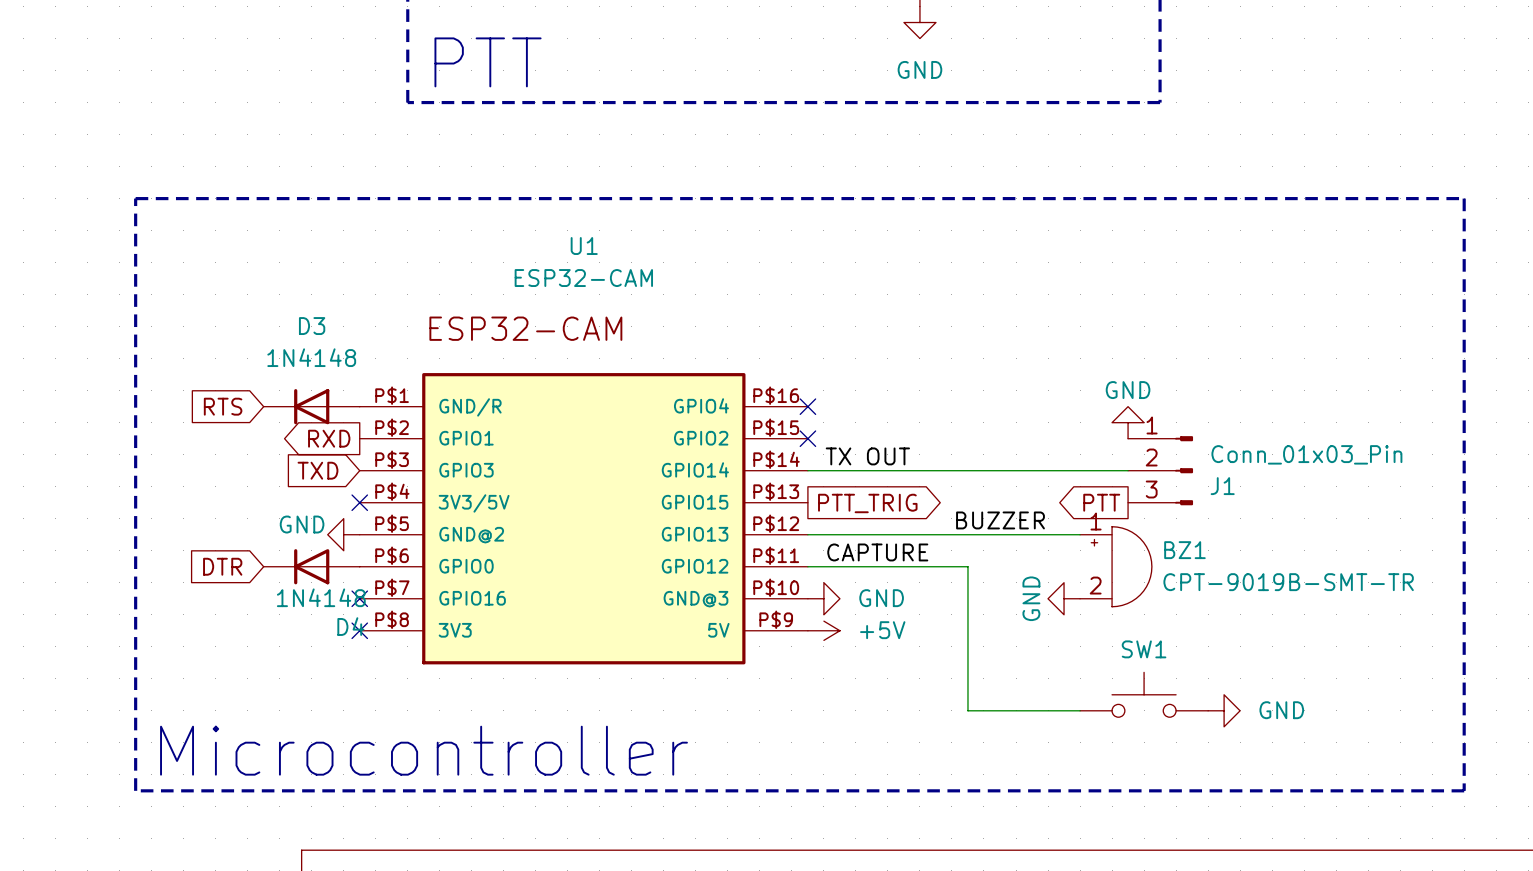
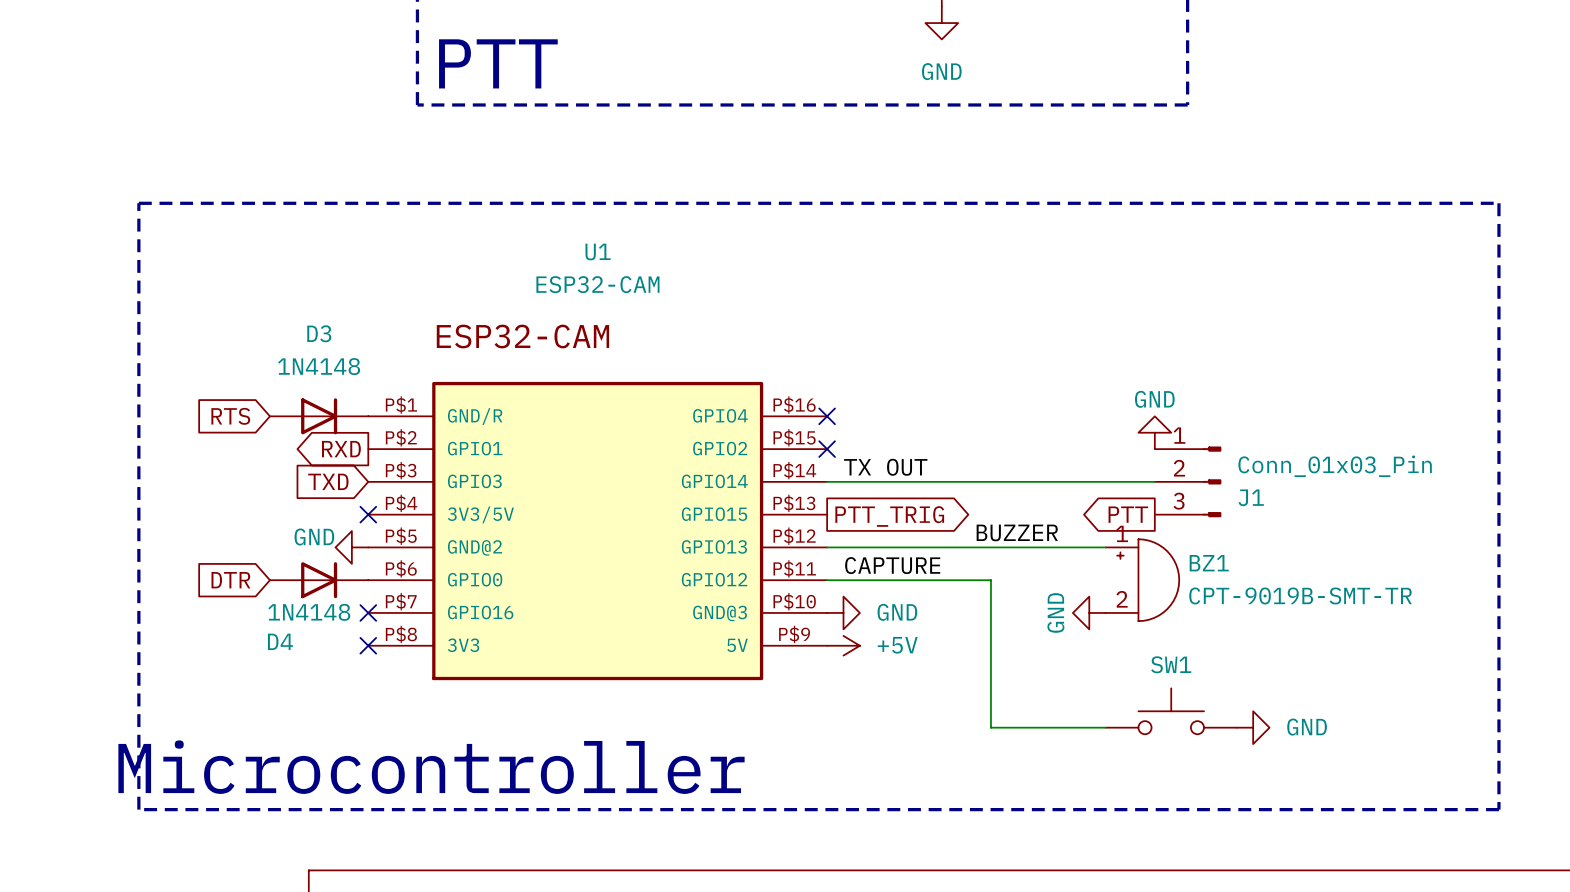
D3 rotation: 0° (311, 406) -> 180° (319, 416)
D4 rotation: 0° (311, 566) -> 180° (319, 580)
D4 name position: D4 (350, 626) -> D4 (280, 641)

